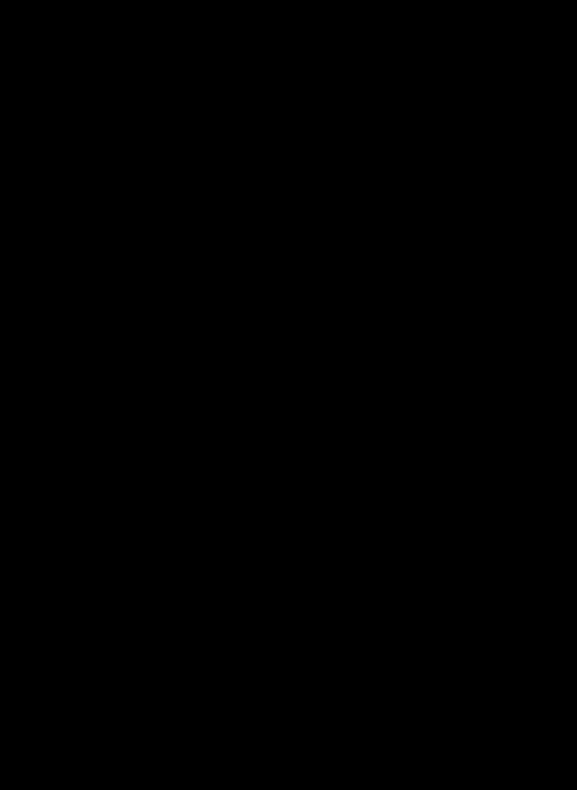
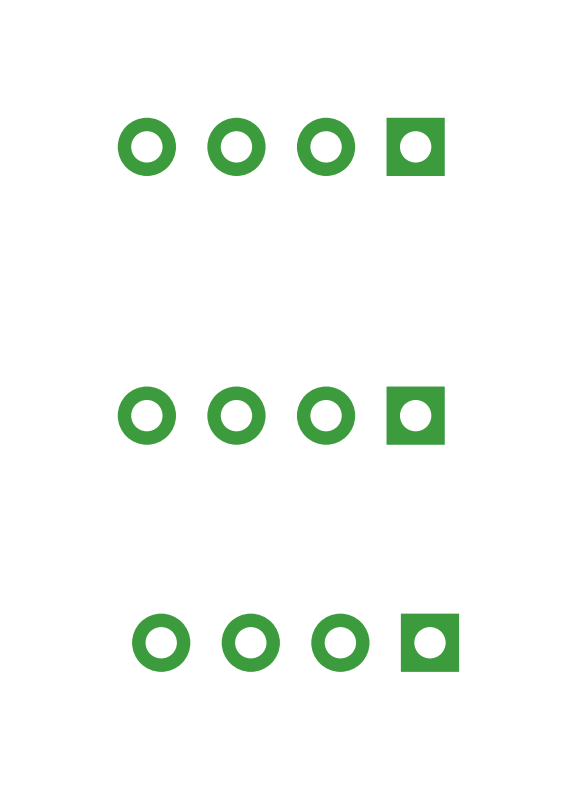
part: none -> (281, 146)
part: none -> (281, 415)
part: none -> (295, 642)

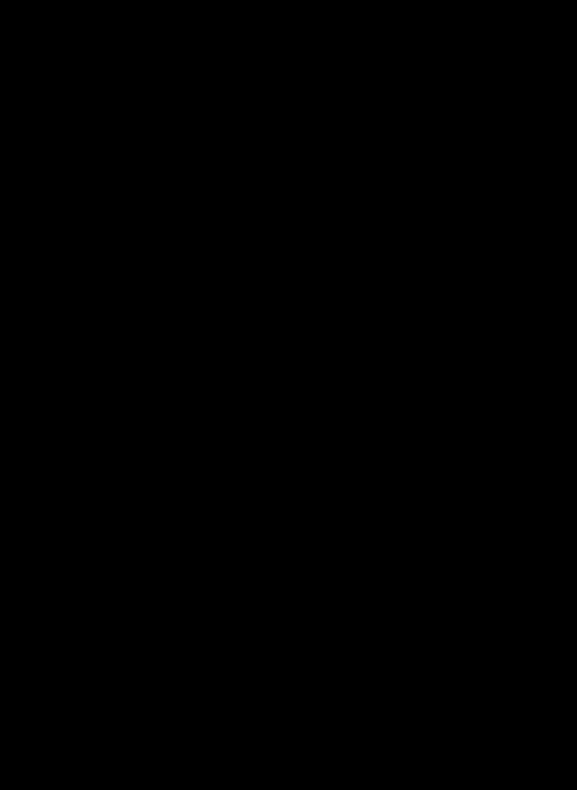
part: (281, 146) -> none
part: (281, 415) -> none
part: (295, 642) -> none

